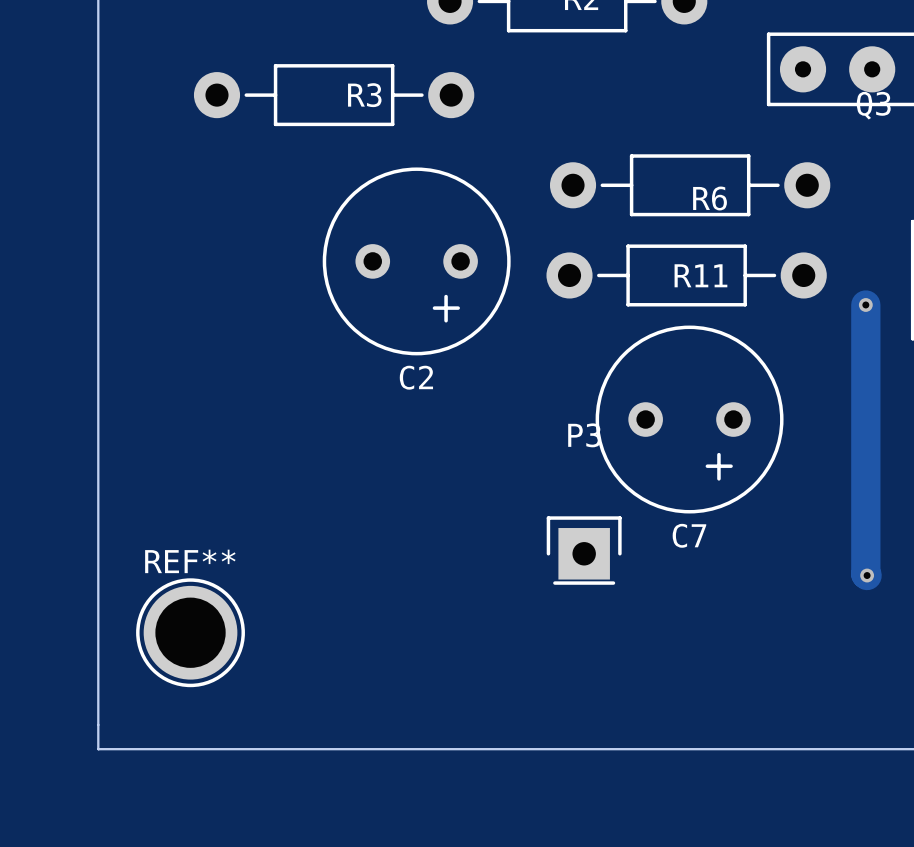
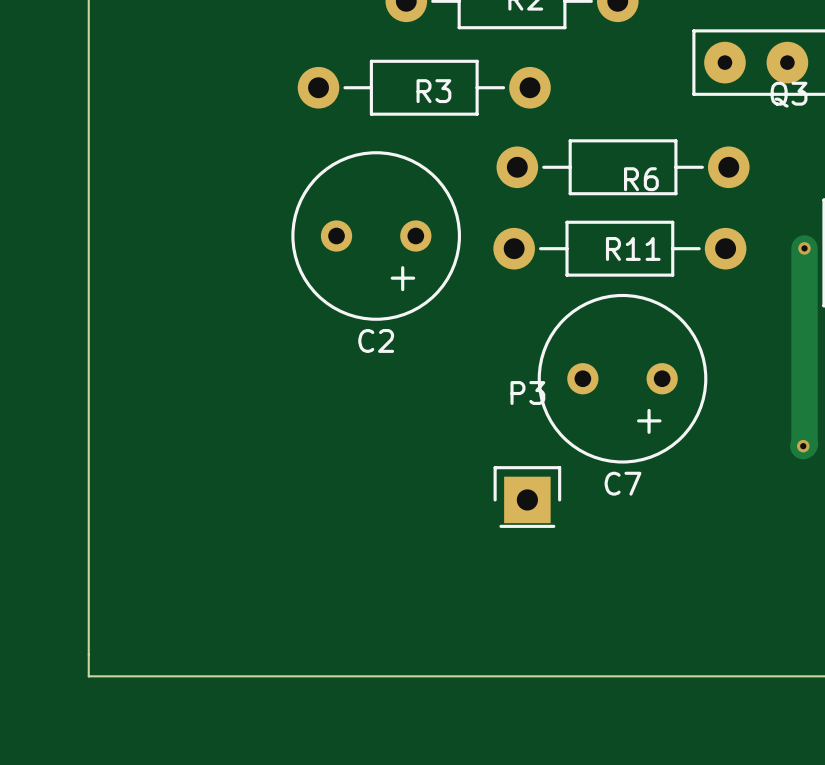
R3 position: (334, 95) -> (424, 87)
R3 name position: R3 (364, 95) -> R3 (433, 91)
track: none -> (804, 248) (803, 446)
track: (865, 304) (867, 575) -> none
via position: (865, 304) -> (804, 248)
via position: (867, 575) -> (803, 446)
REF**: (190, 632) -> none

